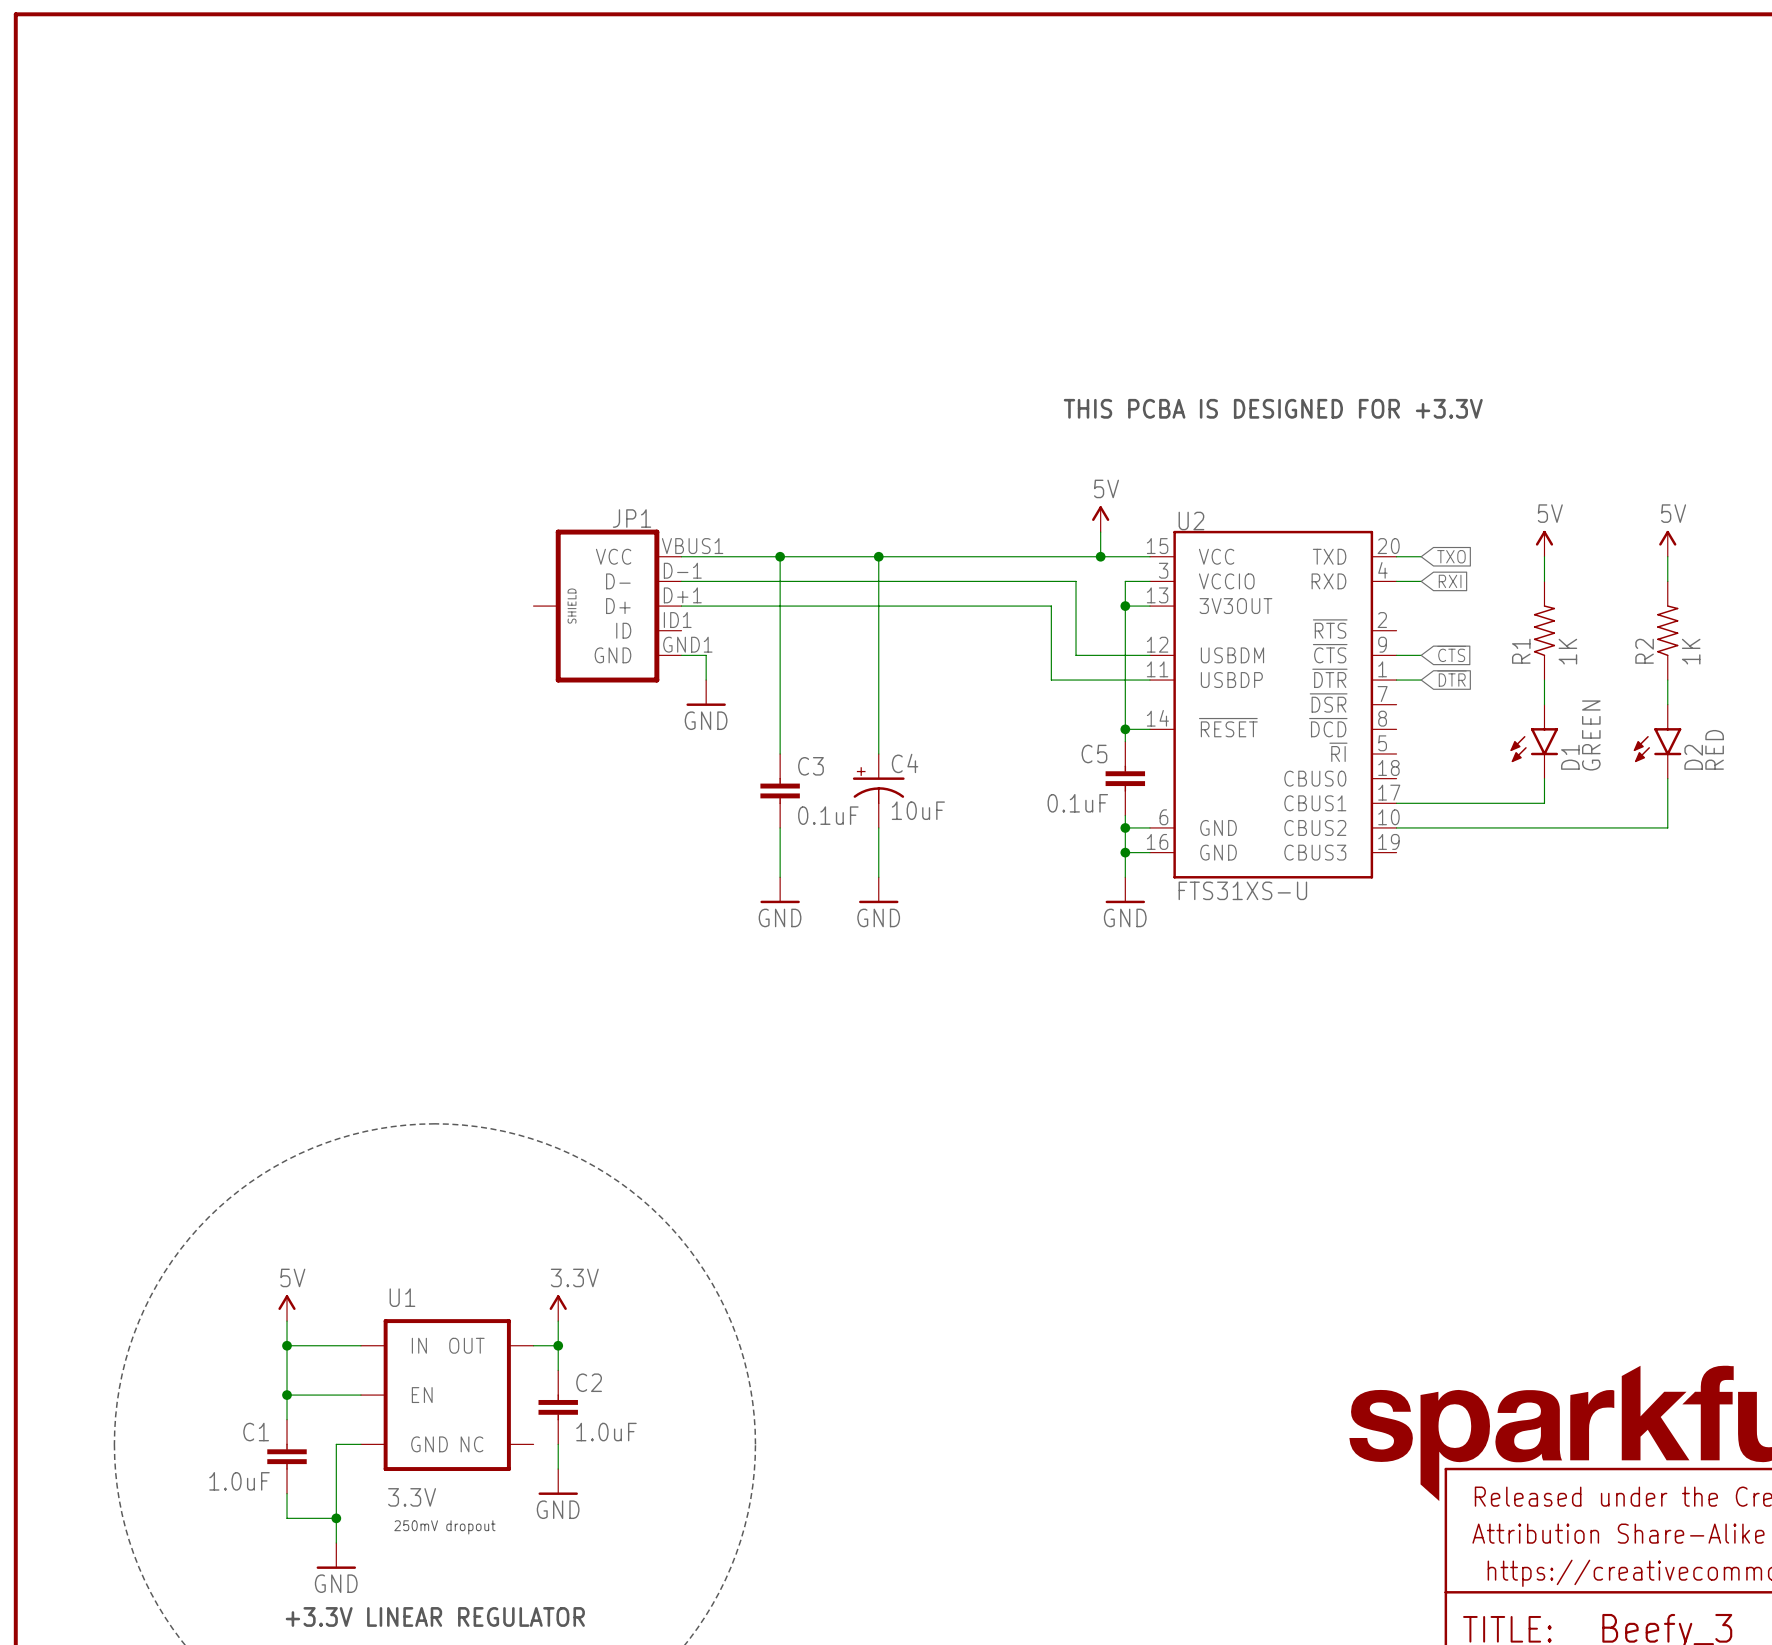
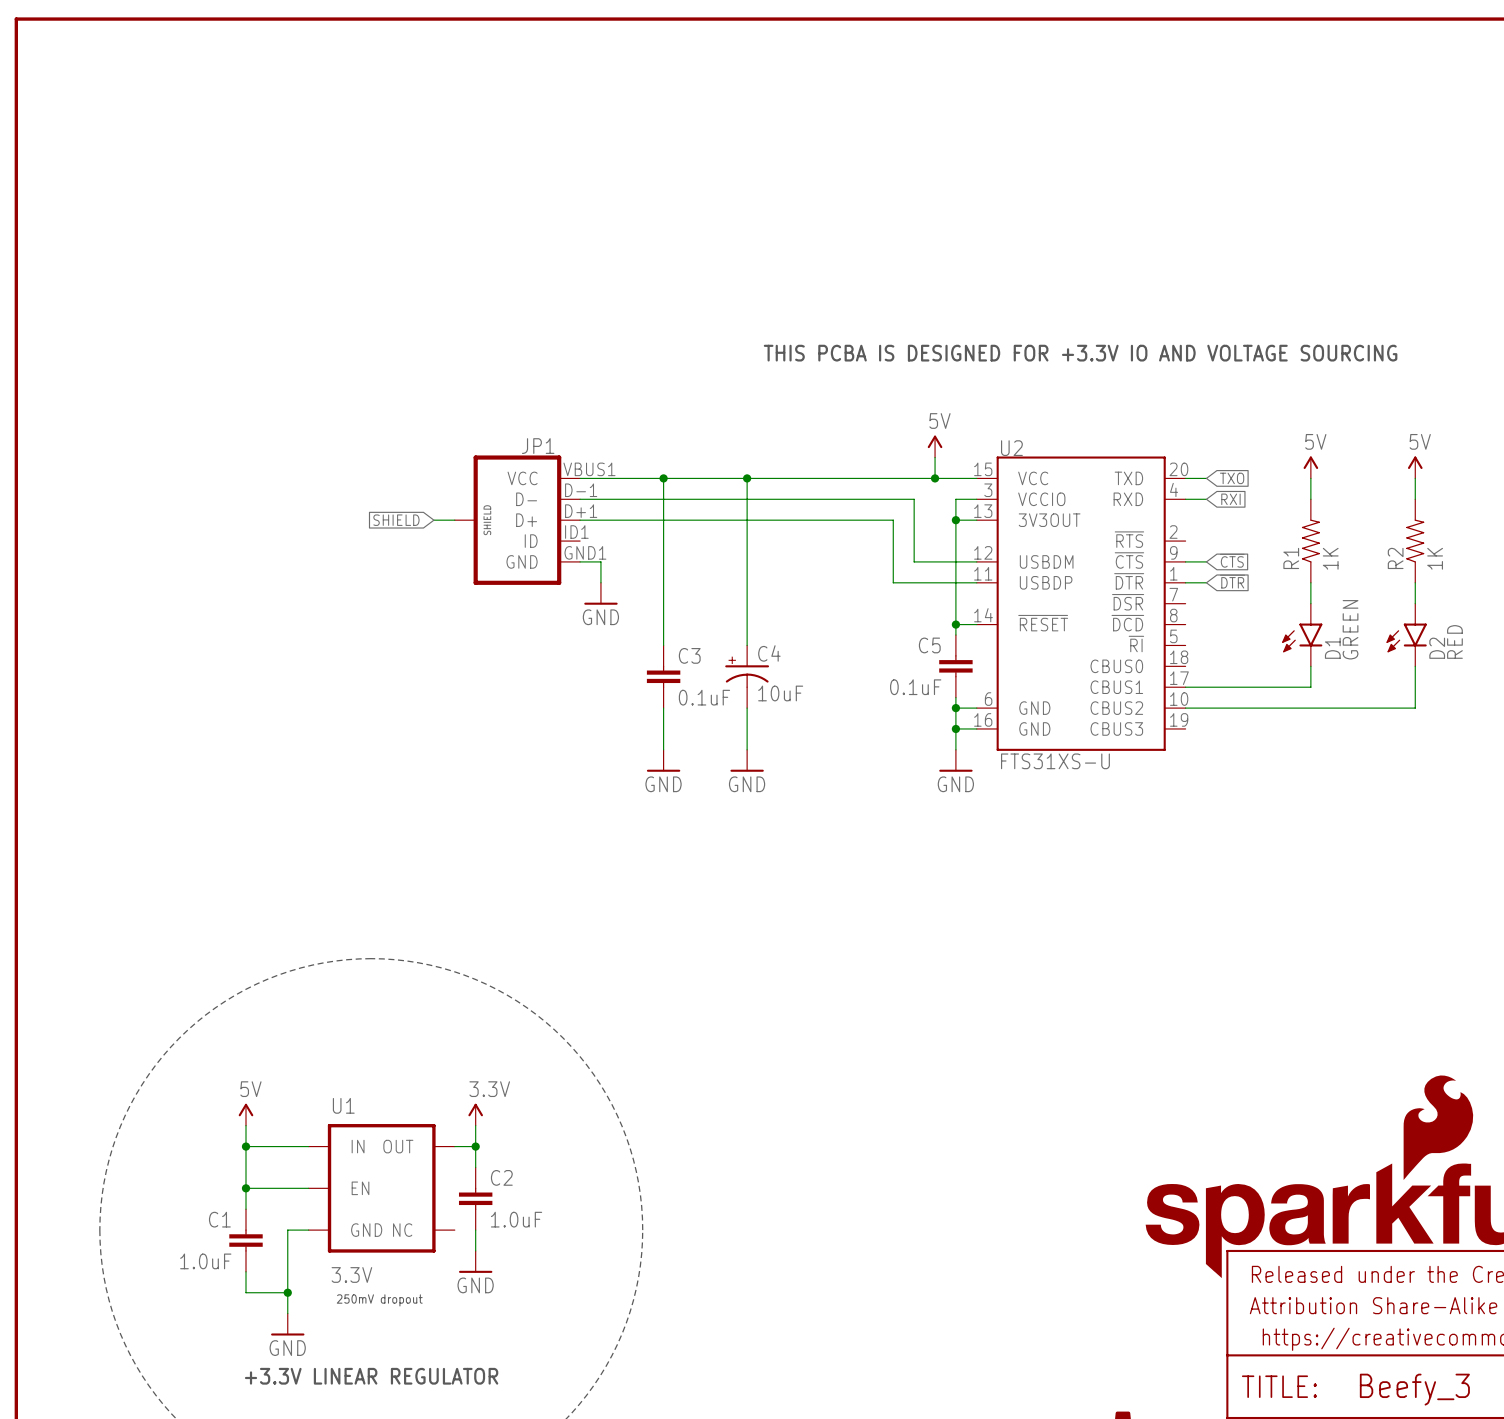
text: THIS PCBA IS DESIGNED FOR +3.3V (1273, 408) -> THIS PCBA IS DESIGNED FOR +3.3V IO AND VOLTAGE SOURCING (1080, 353)
global label: none -> SHIELD (396, 520)
wire: none -> (433, 520) (454, 520)
part: none -> (1438, 1127)

